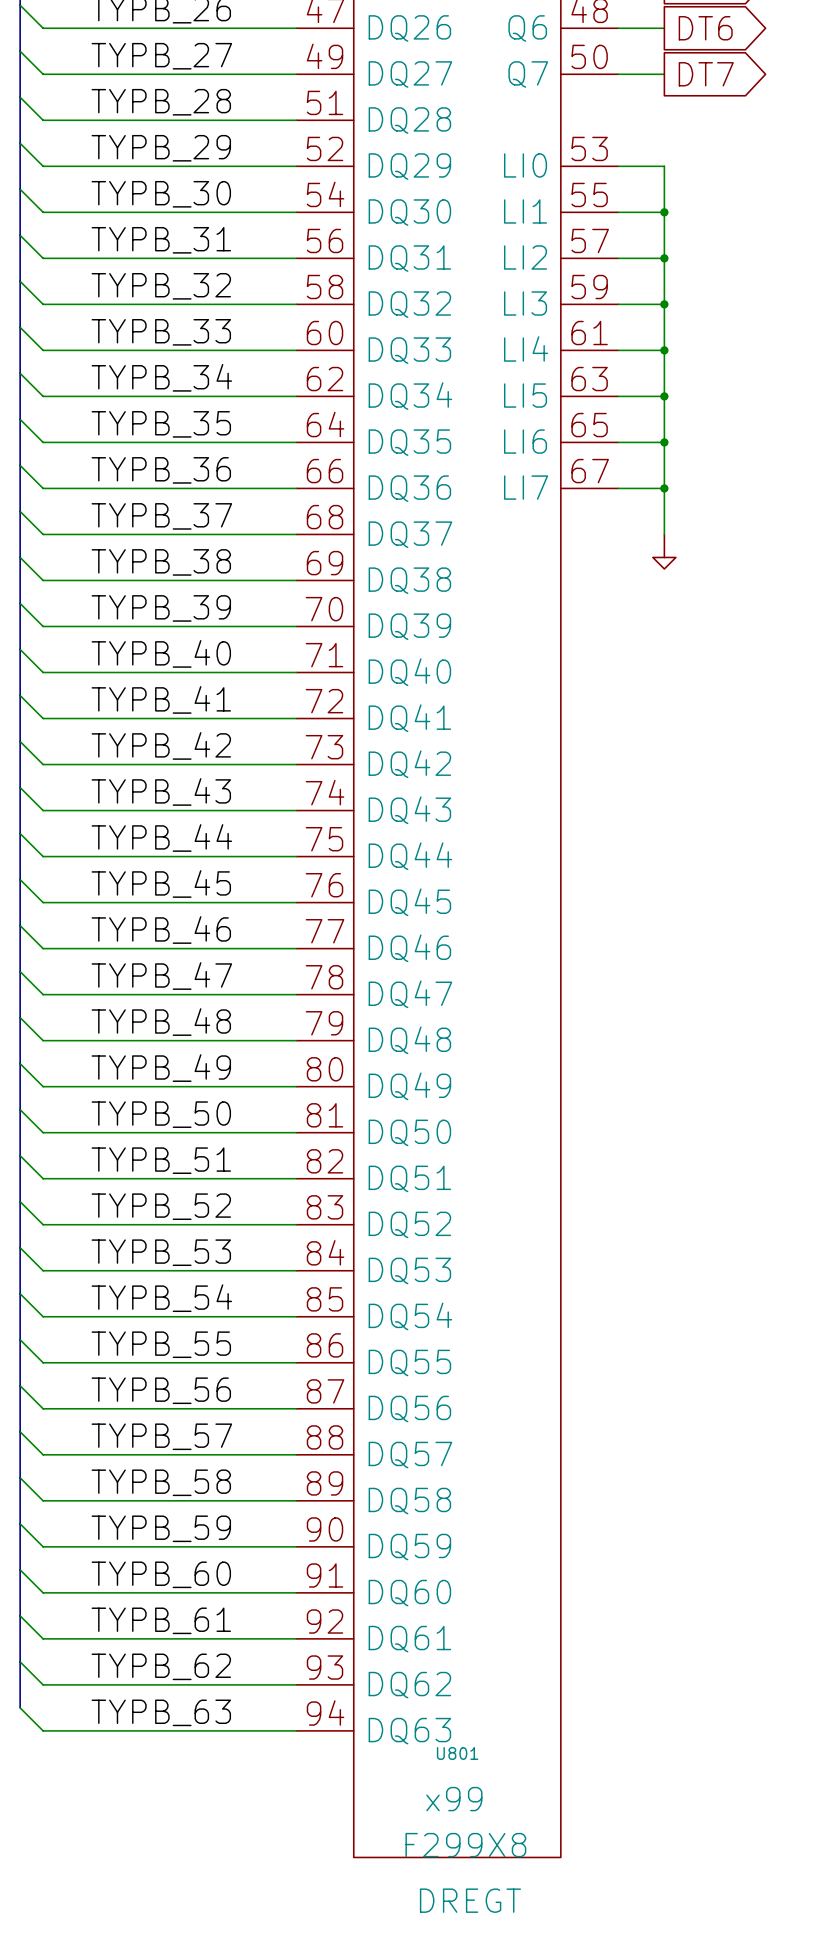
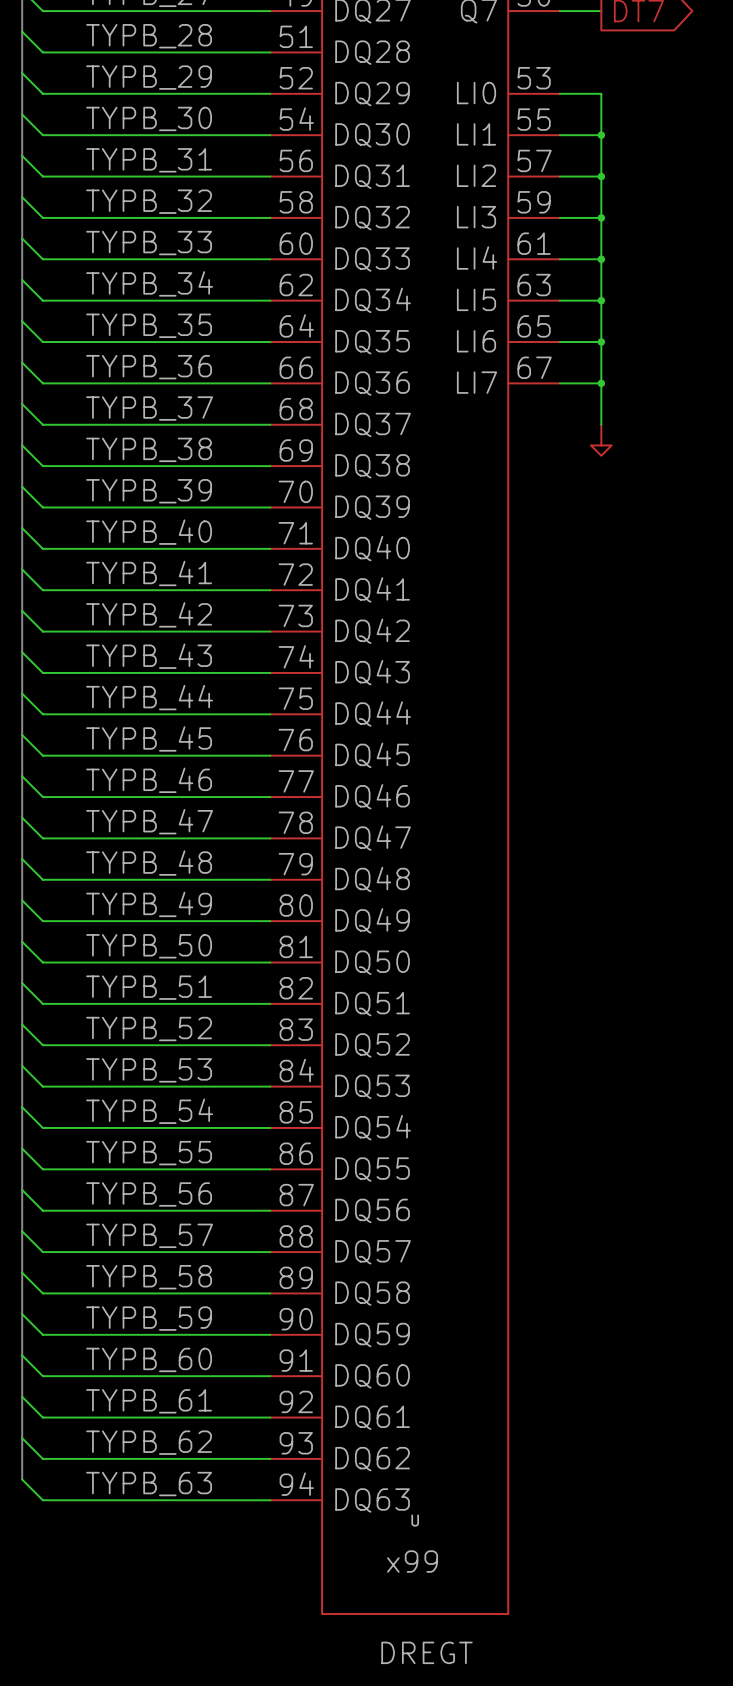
U801 name: U801 (457, 1753) -> U (415, 1520)
U801 value: F299X8 (465, 1845) -> none

